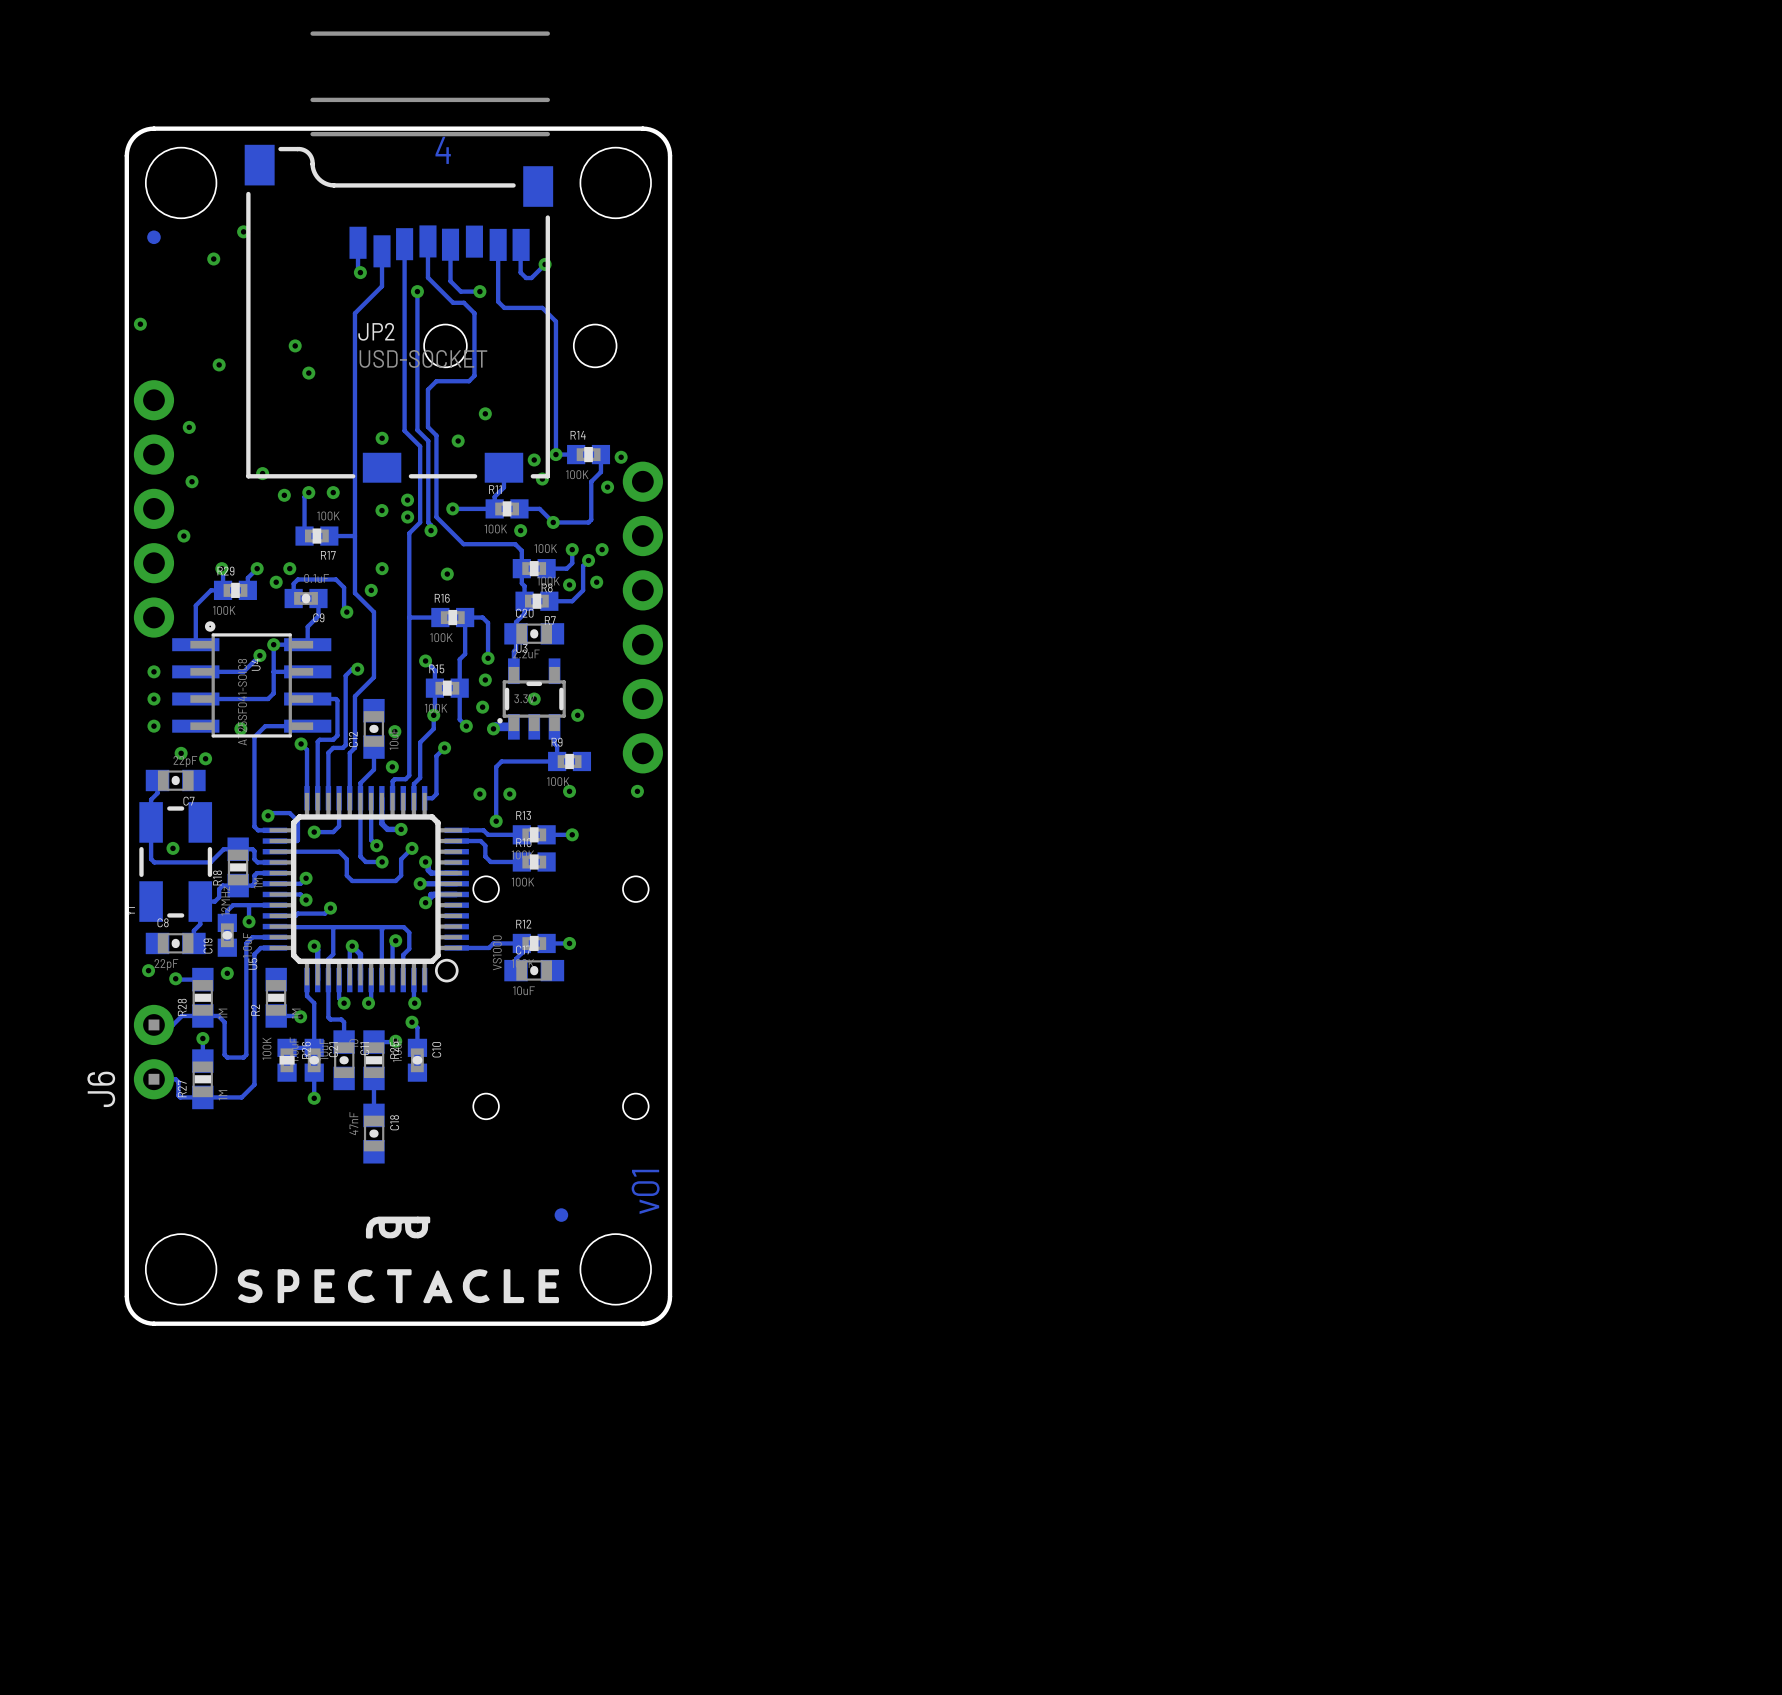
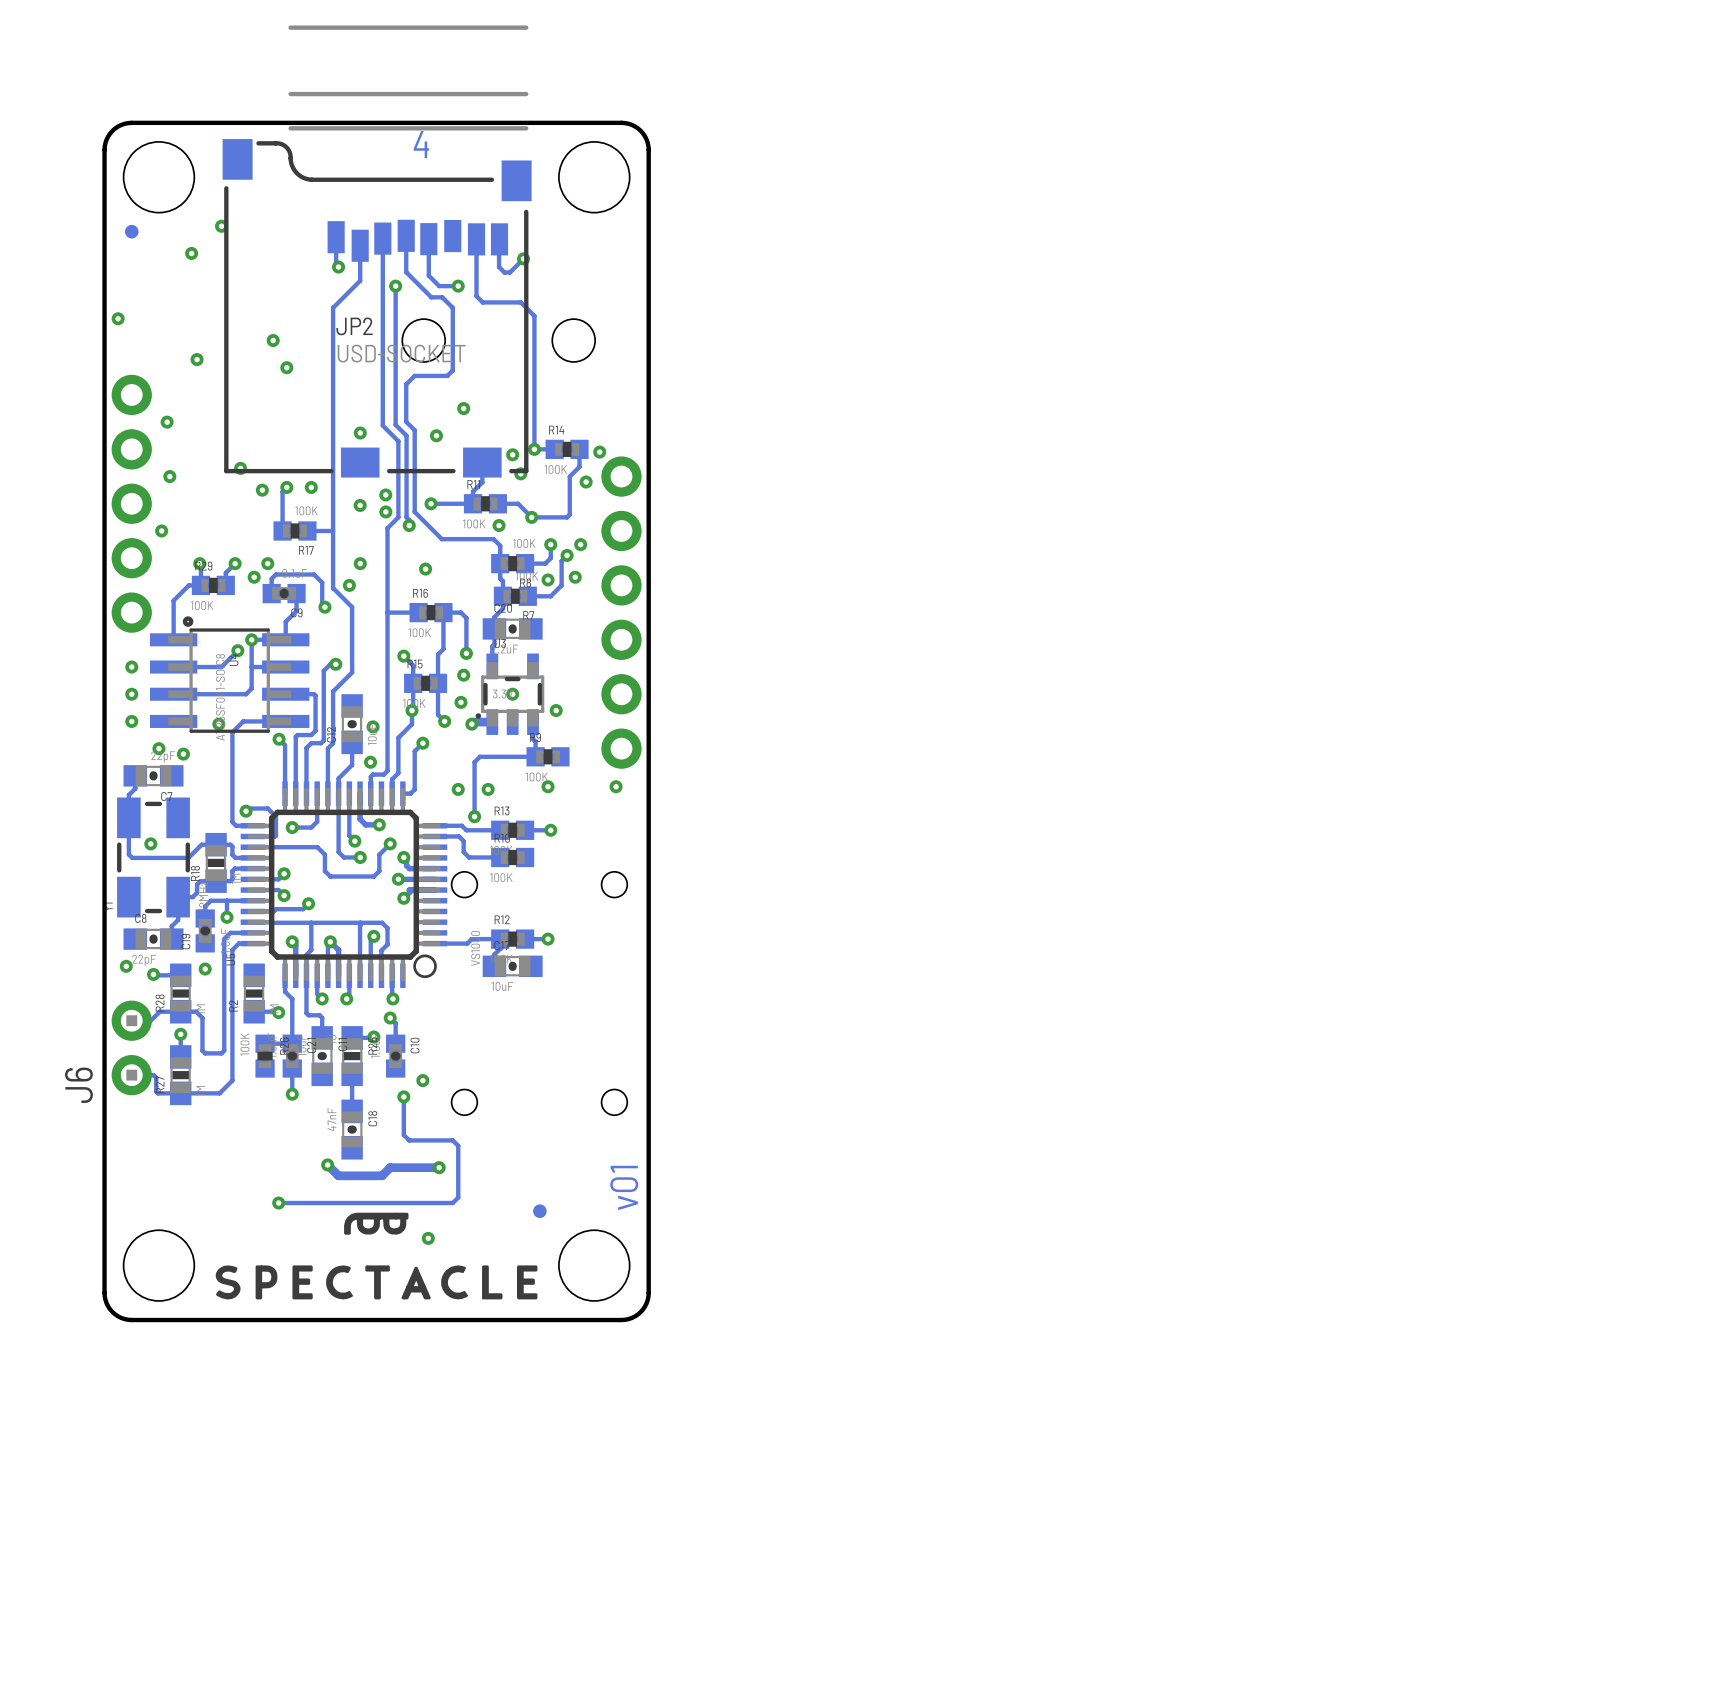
via: none -> (422, 1080)
track: none -> (403, 1096) (403, 1135) (409, 1140) (452, 1140) (458, 1145) (458, 1197) (452, 1203) (278, 1203)
via: none -> (403, 1096)
track: none -> (327, 1164) (338, 1175) (382, 1175) (390, 1167) (439, 1167)
via: none -> (327, 1164)
via: none -> (439, 1167)
via: none -> (278, 1203)
via: none -> (428, 1238)

